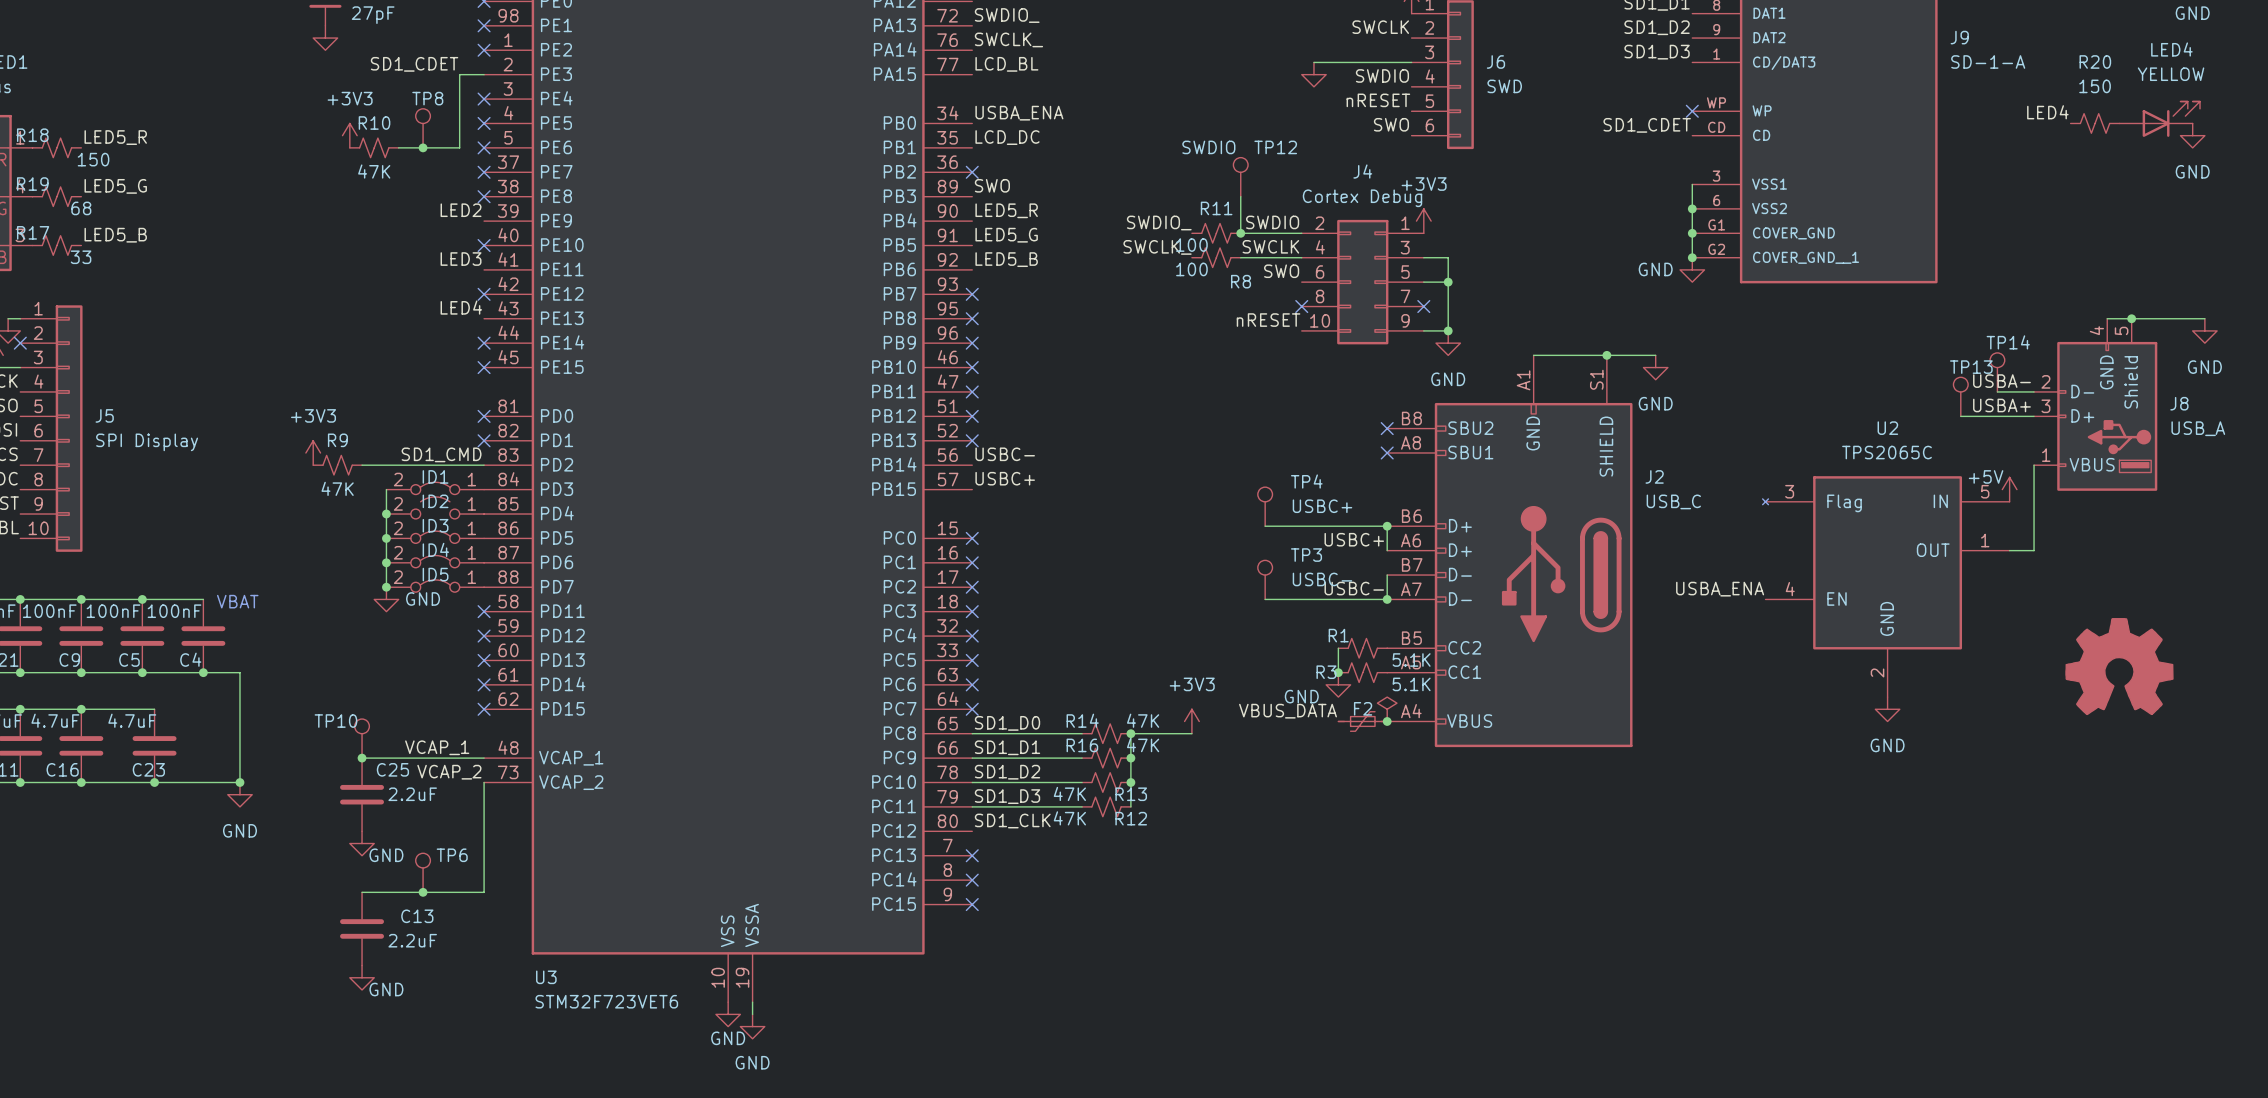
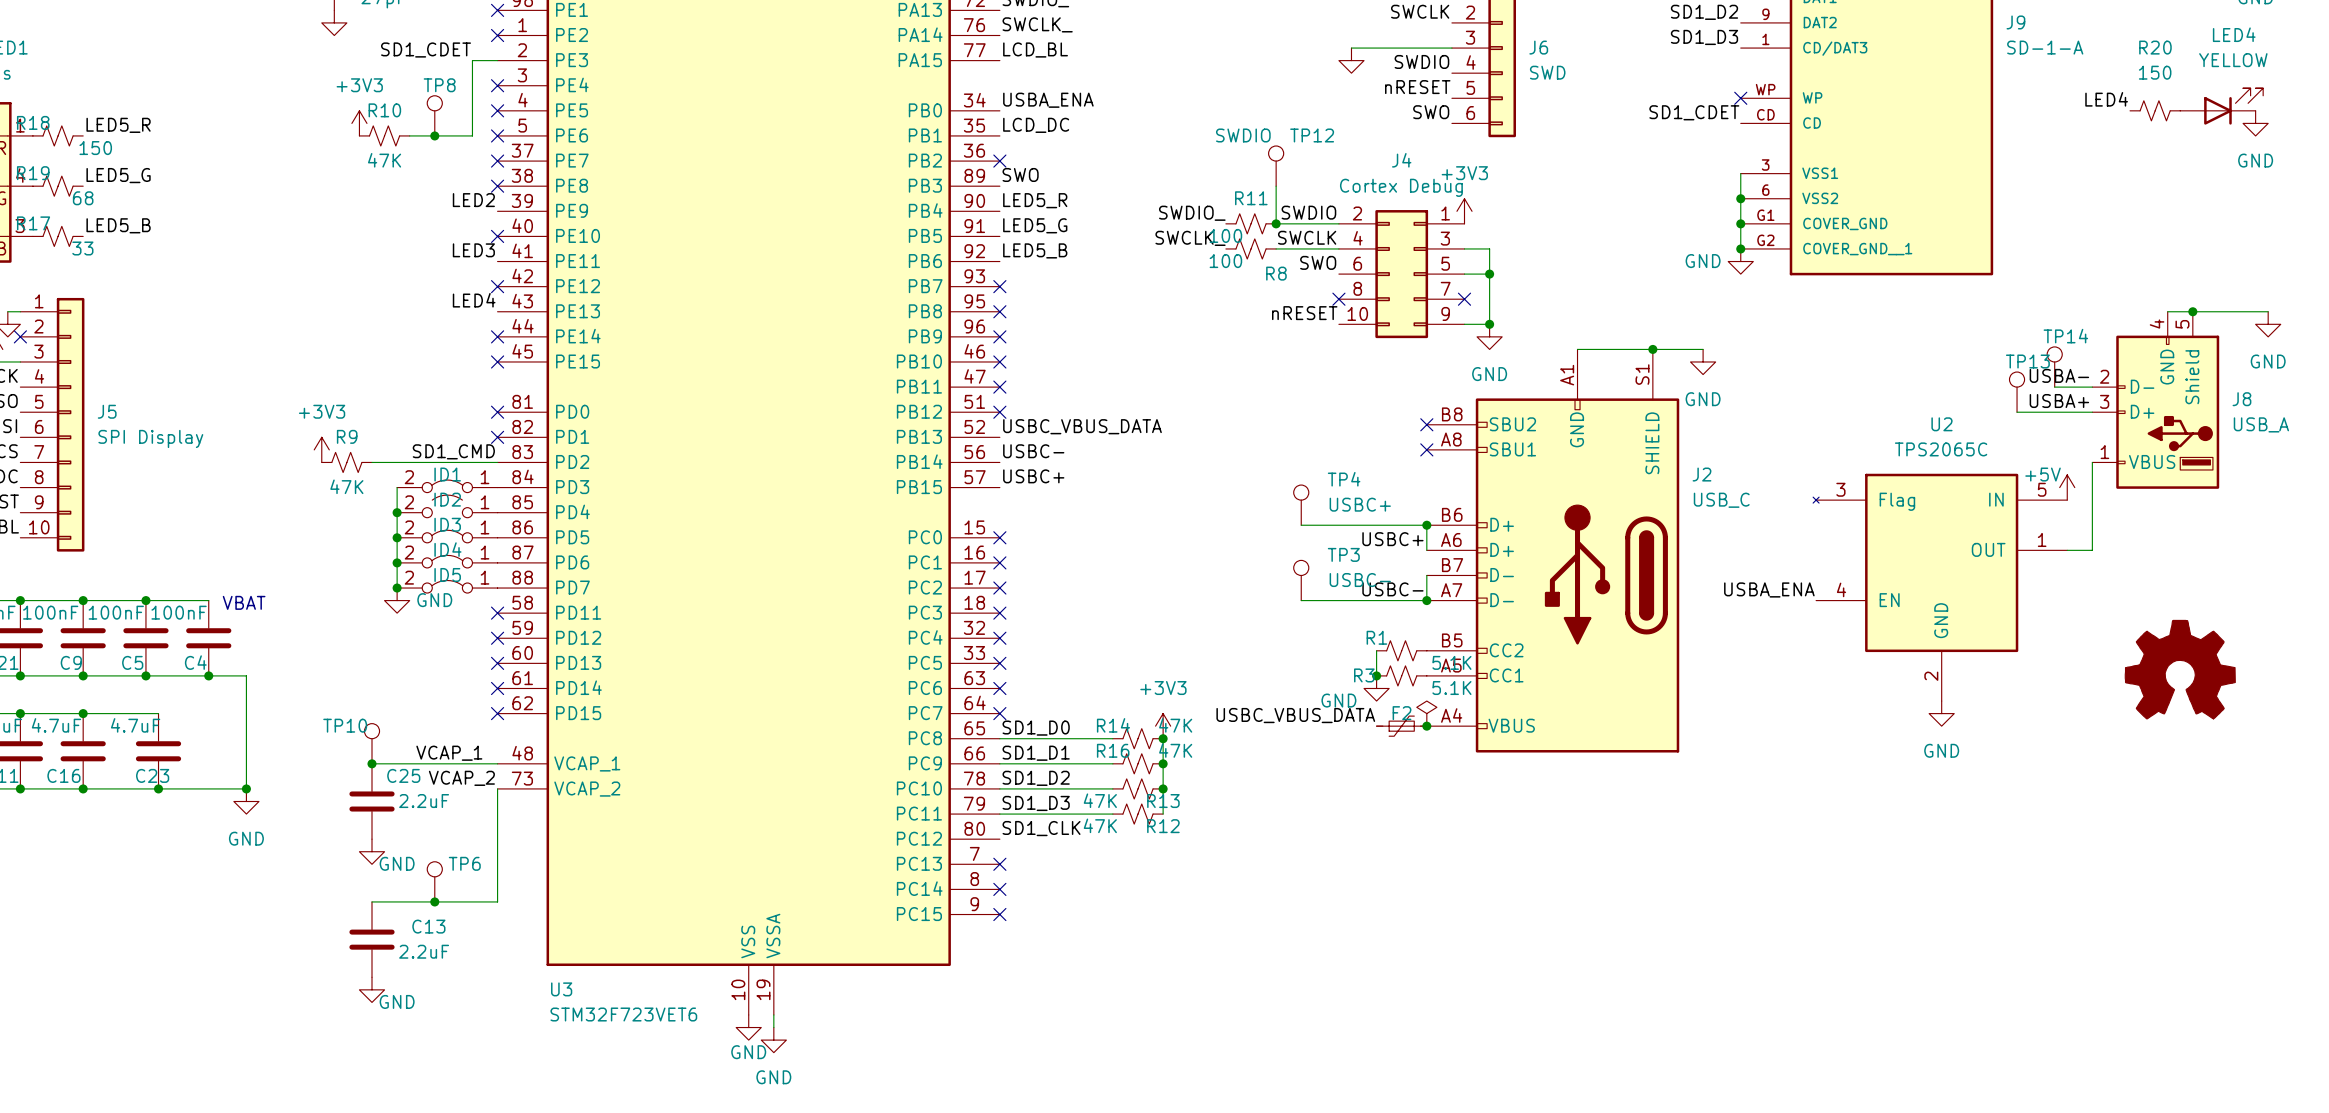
label: none -> USBC_VBUS_DATA (1082, 426)
no-connect mark: (972, 440) -> none
label: VBUS_DATA (1288, 711) -> USBC_VBUS_DATA (1295, 715)
power symbol position: +3V3 (1191, 721) -> +3V3 (1163, 726)
wire: (1130, 733) (1191, 733) -> none

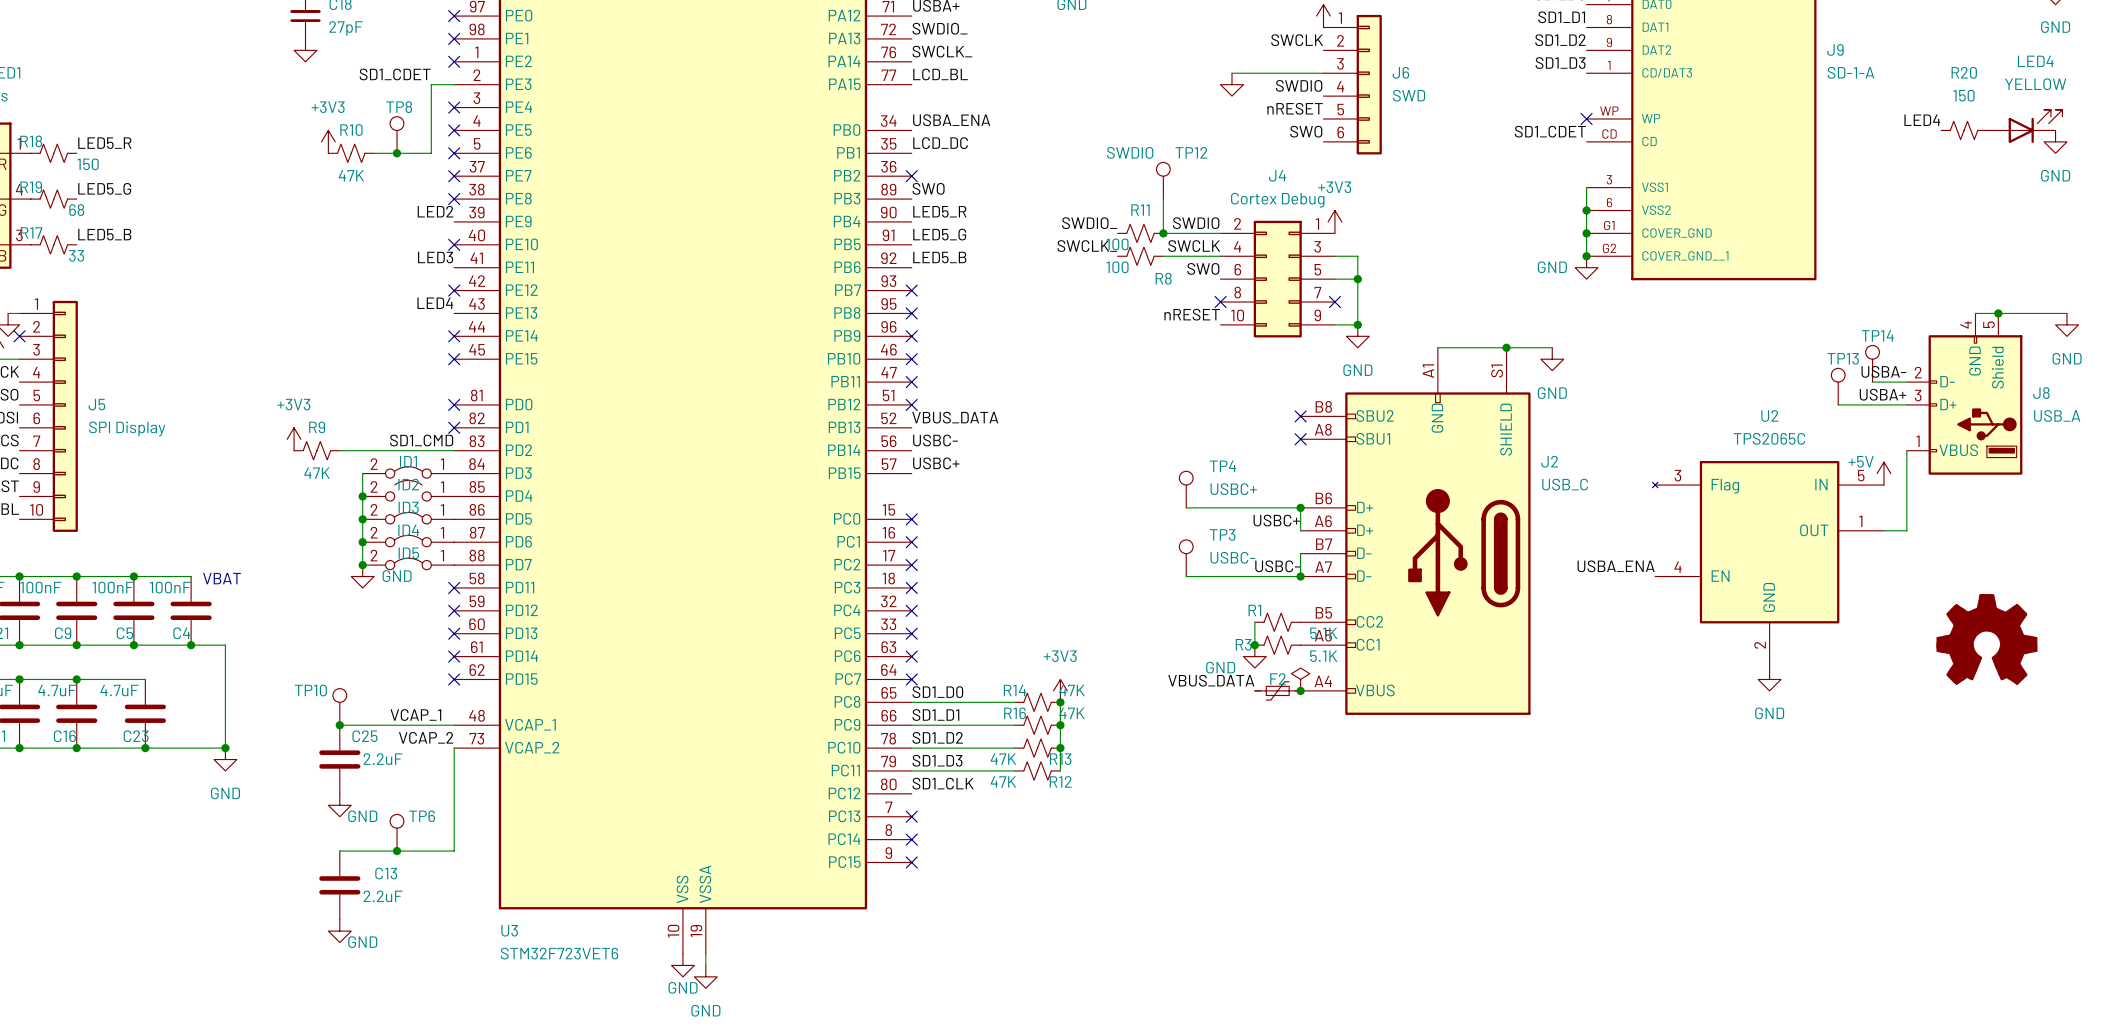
label: USBC_VBUS_DATA (1082, 426) -> VBUS_DATA (955, 417)
label: USBC_VBUS_DATA (1295, 715) -> VBUS_DATA (1211, 680)

